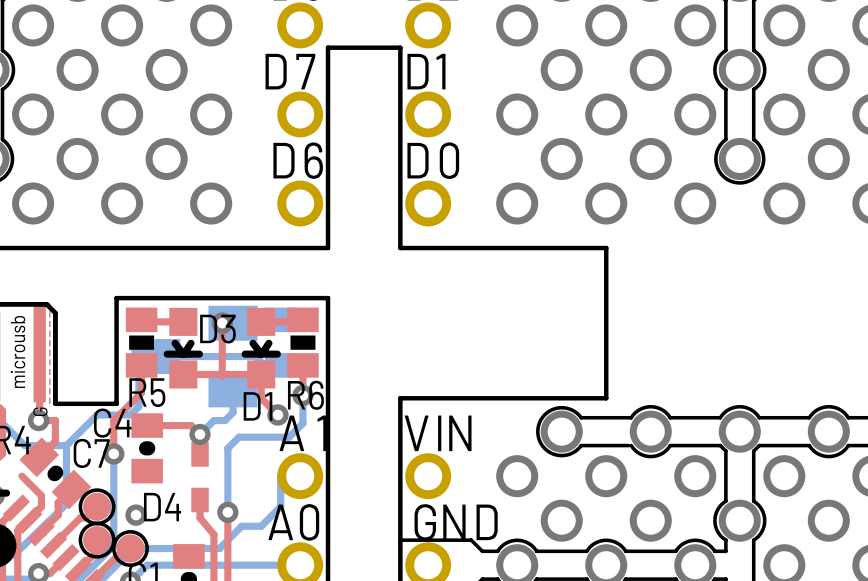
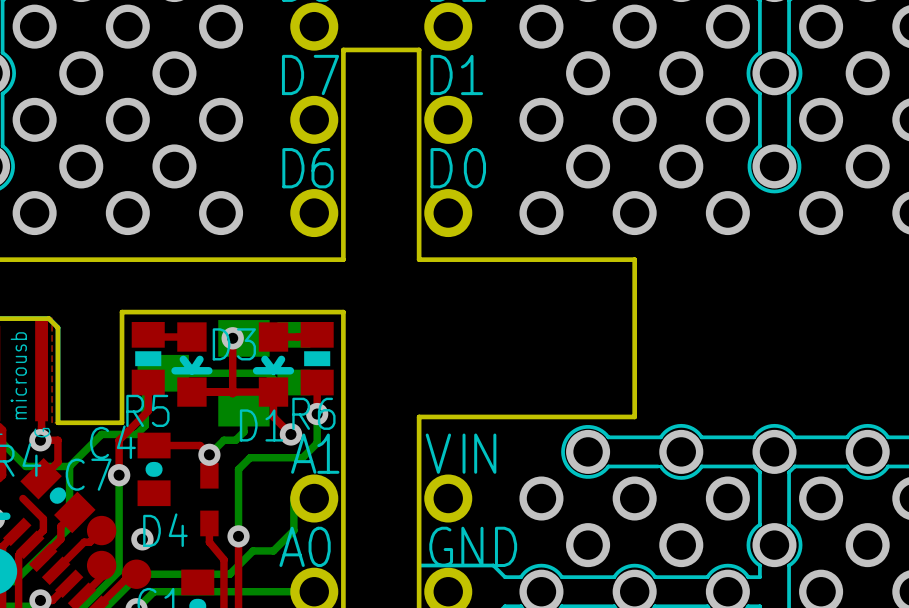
drawing: [78, 488, 149, 567] -> none

